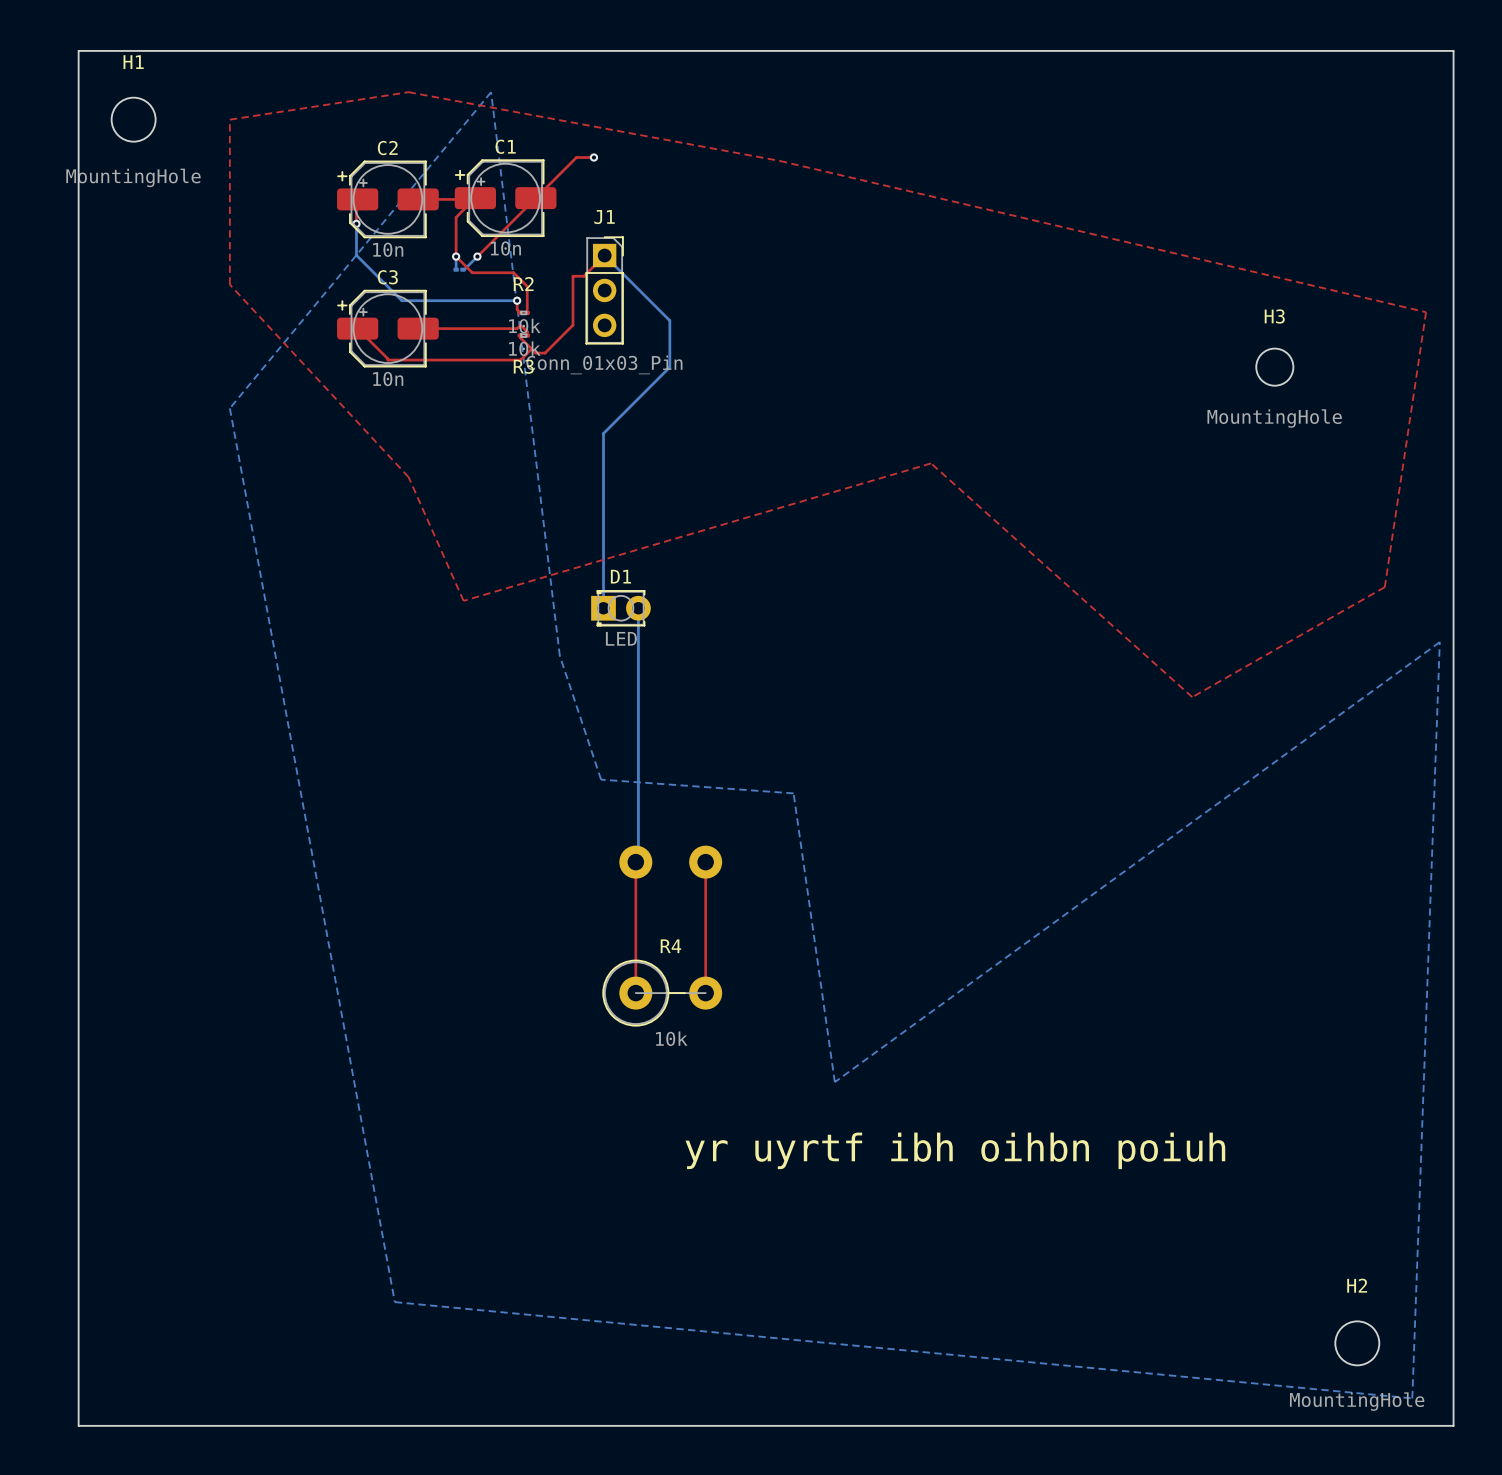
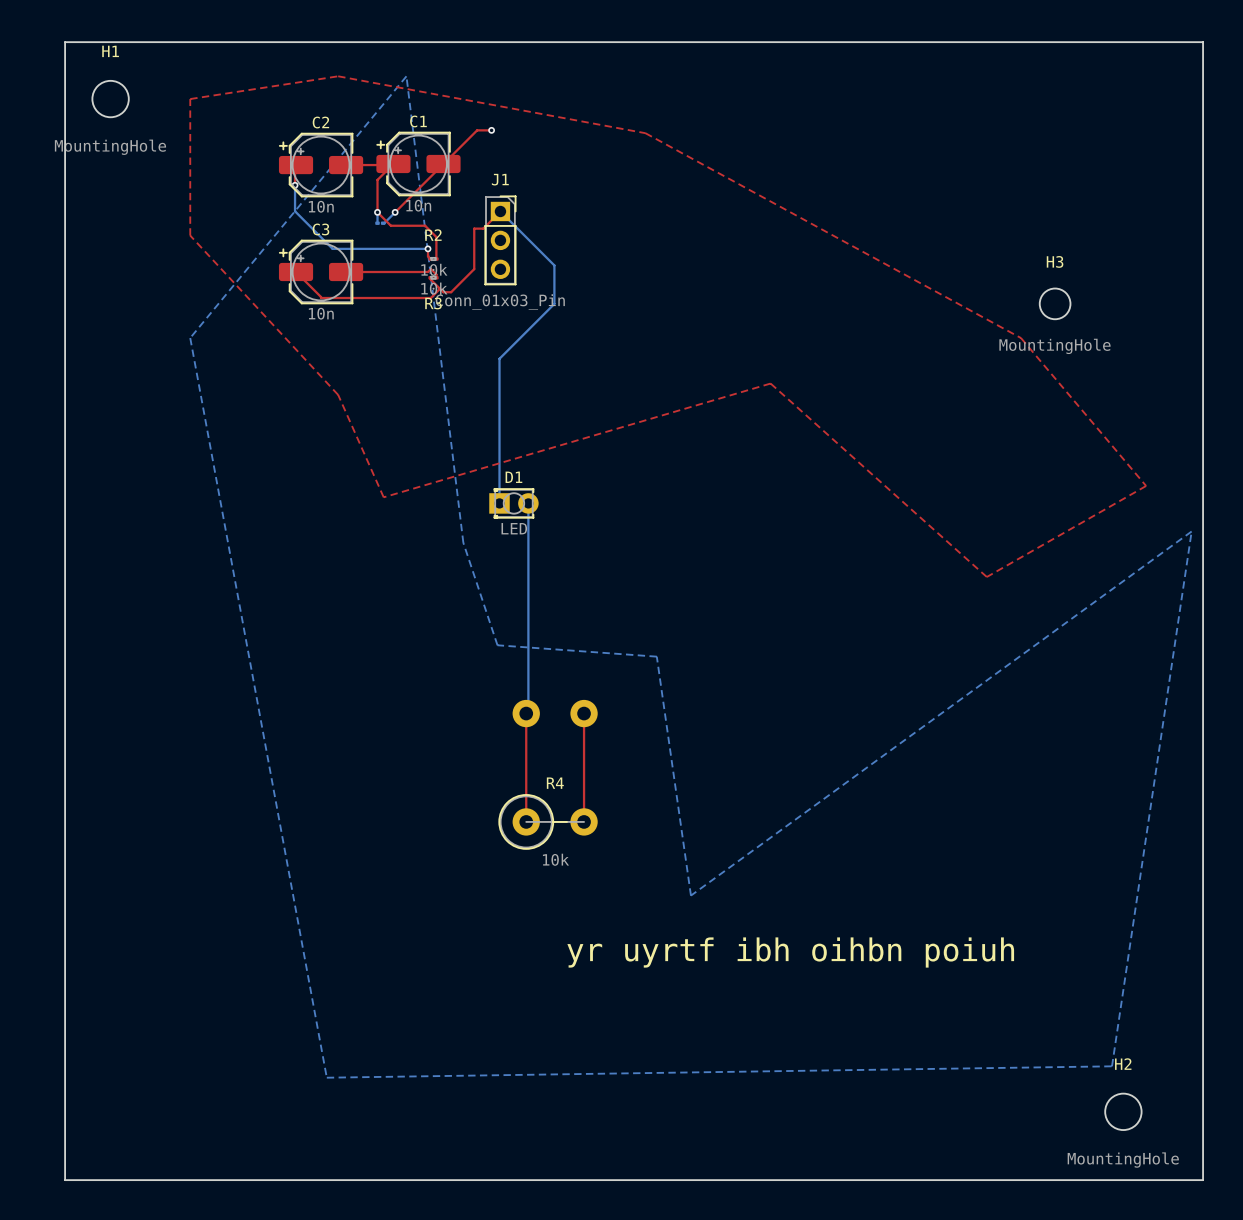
top zone outline: (779, 160) (1426, 312) (1384, 587) -> (645, 133) (1020, 338) (1146, 485)
bottom zone outline: (1439, 642) (1412, 1398) (394, 1302) -> (1191, 531) (1112, 1066) (326, 1077)

